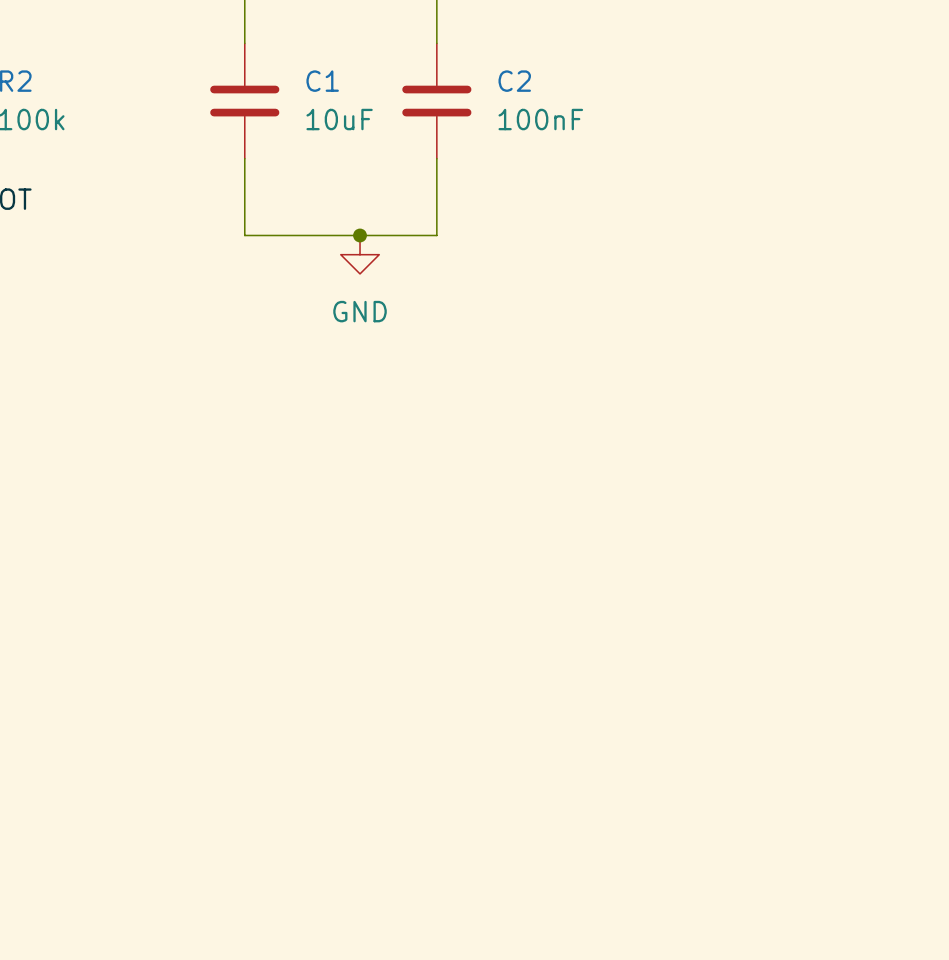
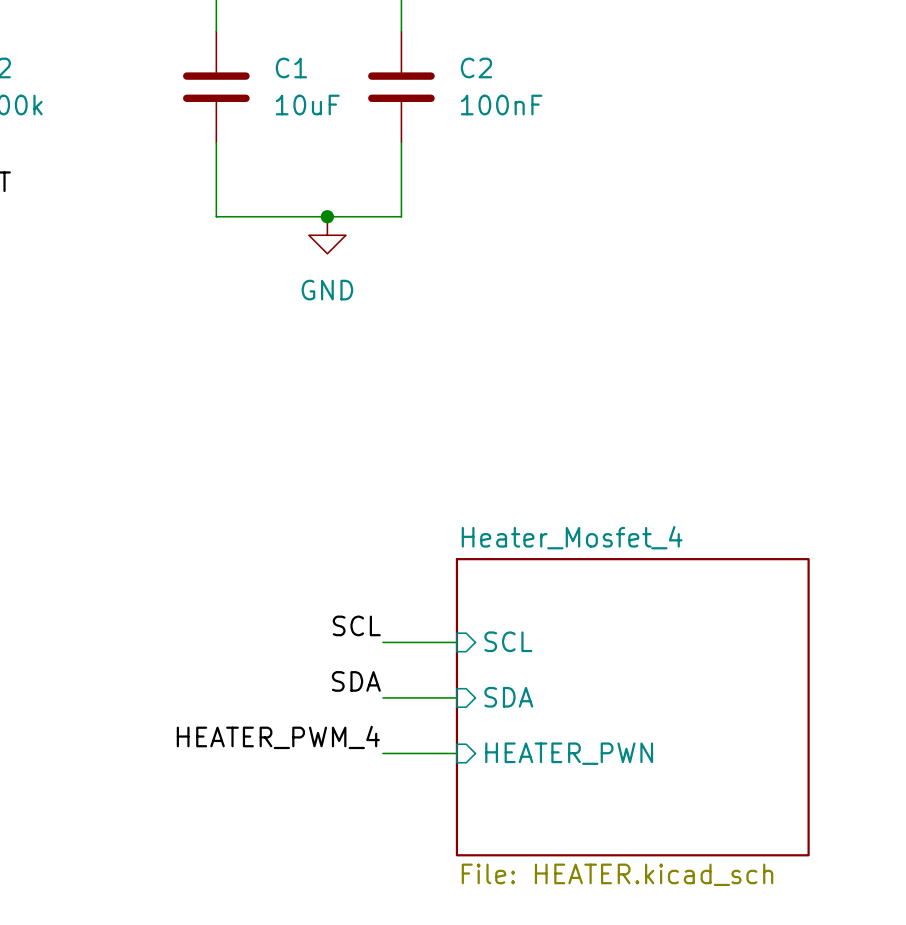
label: none -> SCL (356, 625)
sheet pin: none -> SCL (508, 641)
wire: none -> (382, 642) (456, 642)
label: none -> SDA (356, 681)
wire: none -> (382, 697) (456, 697)
sheet pin: none -> SDA (508, 697)
sheet Heater_Mosfet_4: none -> File: HEATER.kicad_sch (632, 707)
label: none -> HEATER_PWM_4 (278, 737)
wire: none -> (382, 753) (456, 753)
sheet pin: none -> HEATER_PWN (569, 753)

